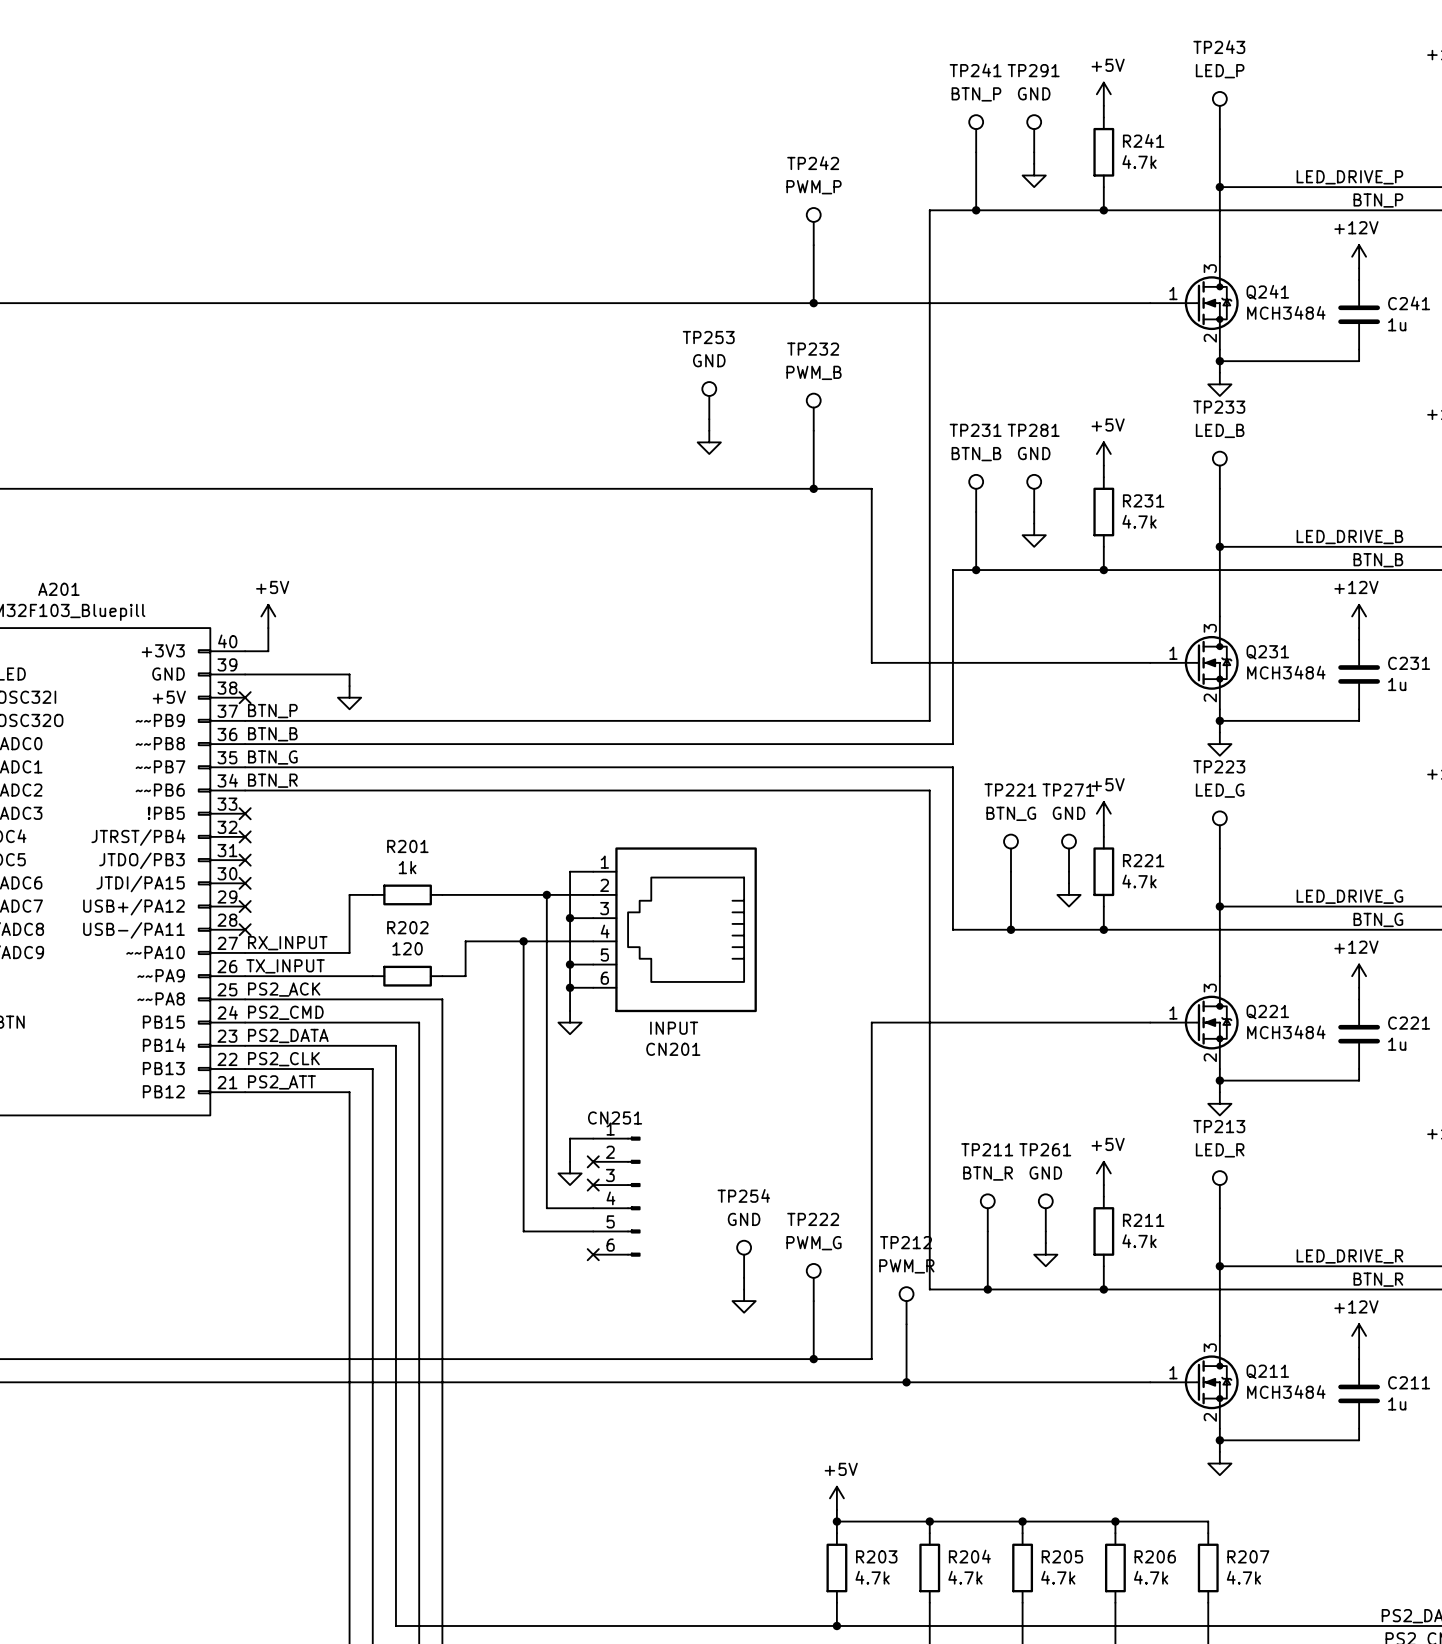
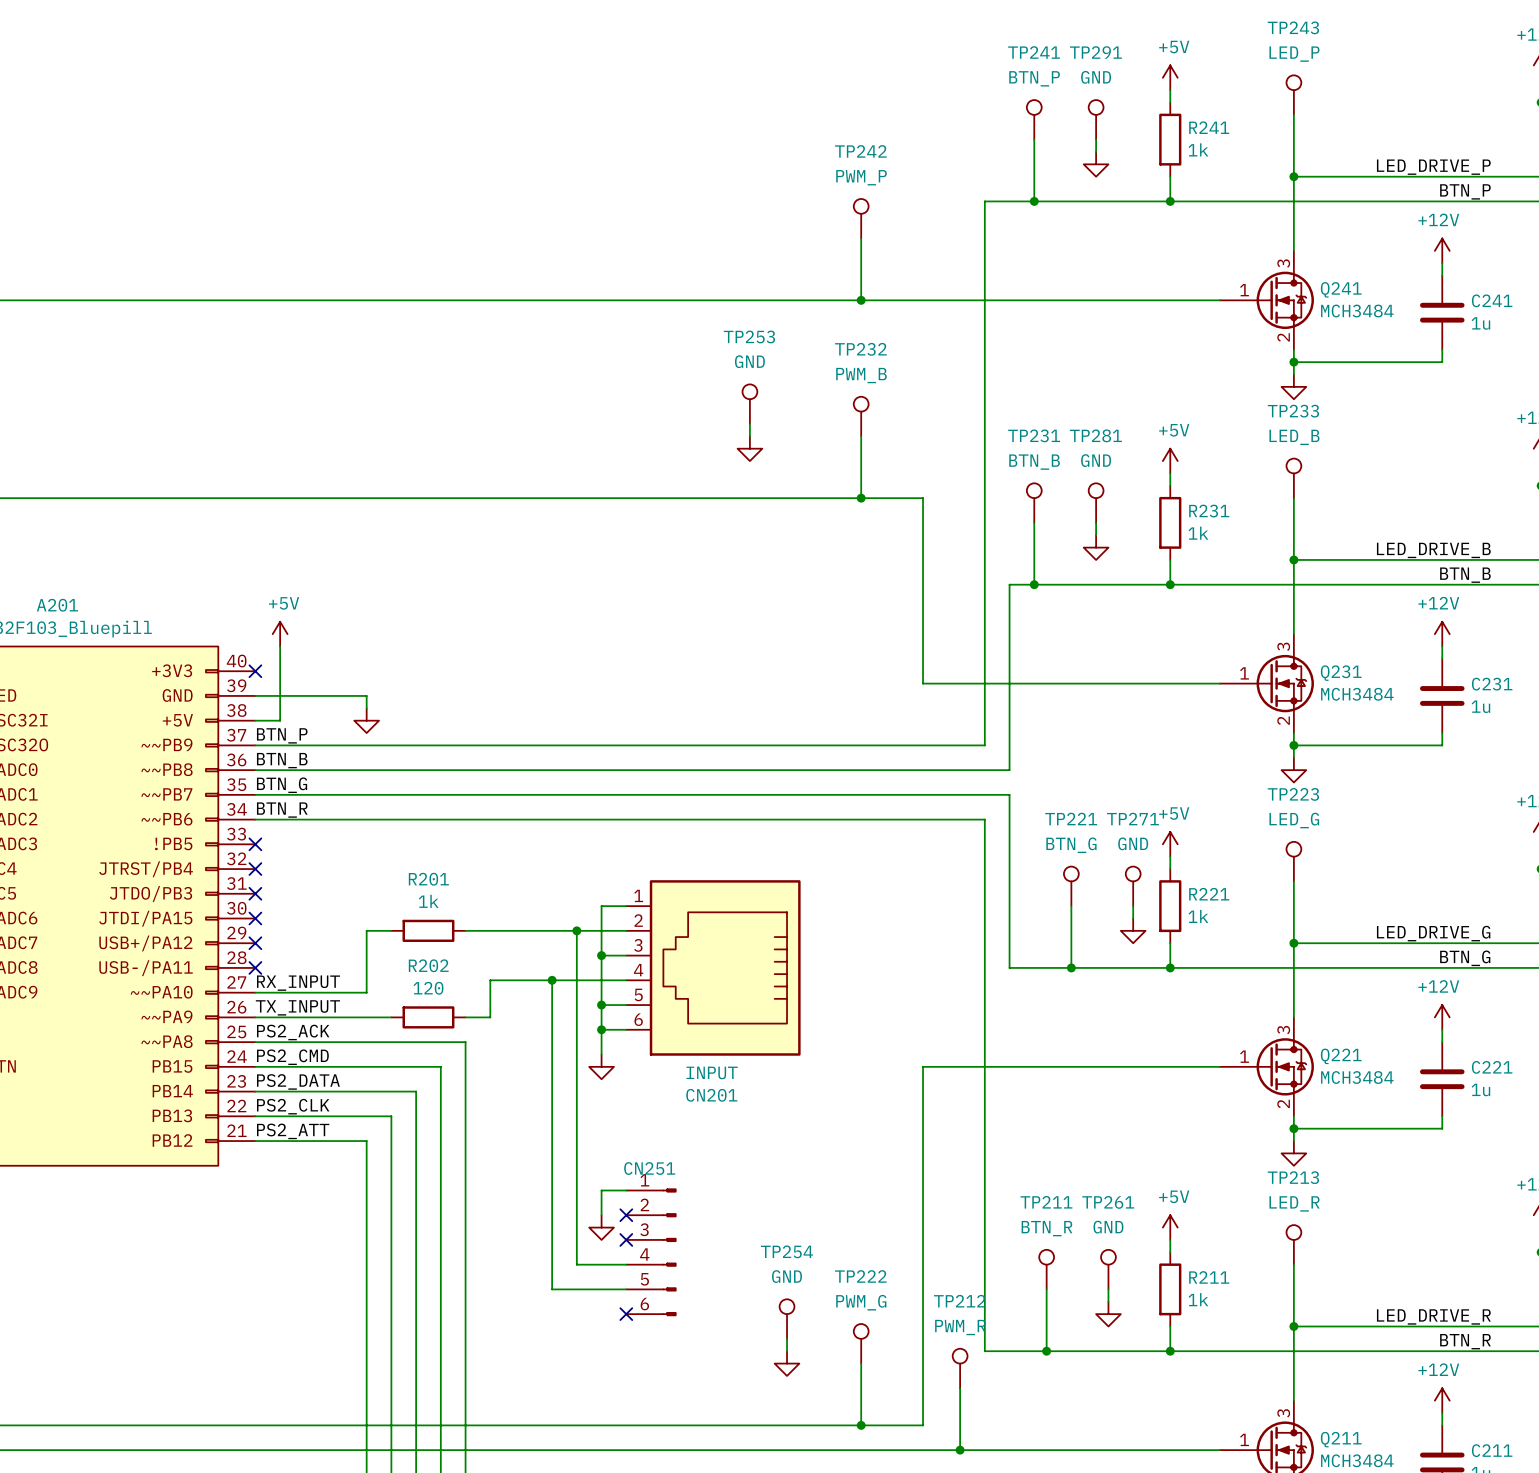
R241 value: 4.7k (1139, 162) -> 1k (1198, 149)
R231 value: 4.7k (1139, 521) -> 1k (1198, 533)
wire: (245, 651) (268, 651) -> (255, 720) (280, 720) (280, 671)
no-connect mark position: (245, 697) -> (255, 671)
R221 value: 4.7k (1139, 881) -> 1k (1198, 916)
R211 value: 4.7k (1139, 1241) -> 1k (1198, 1299)

